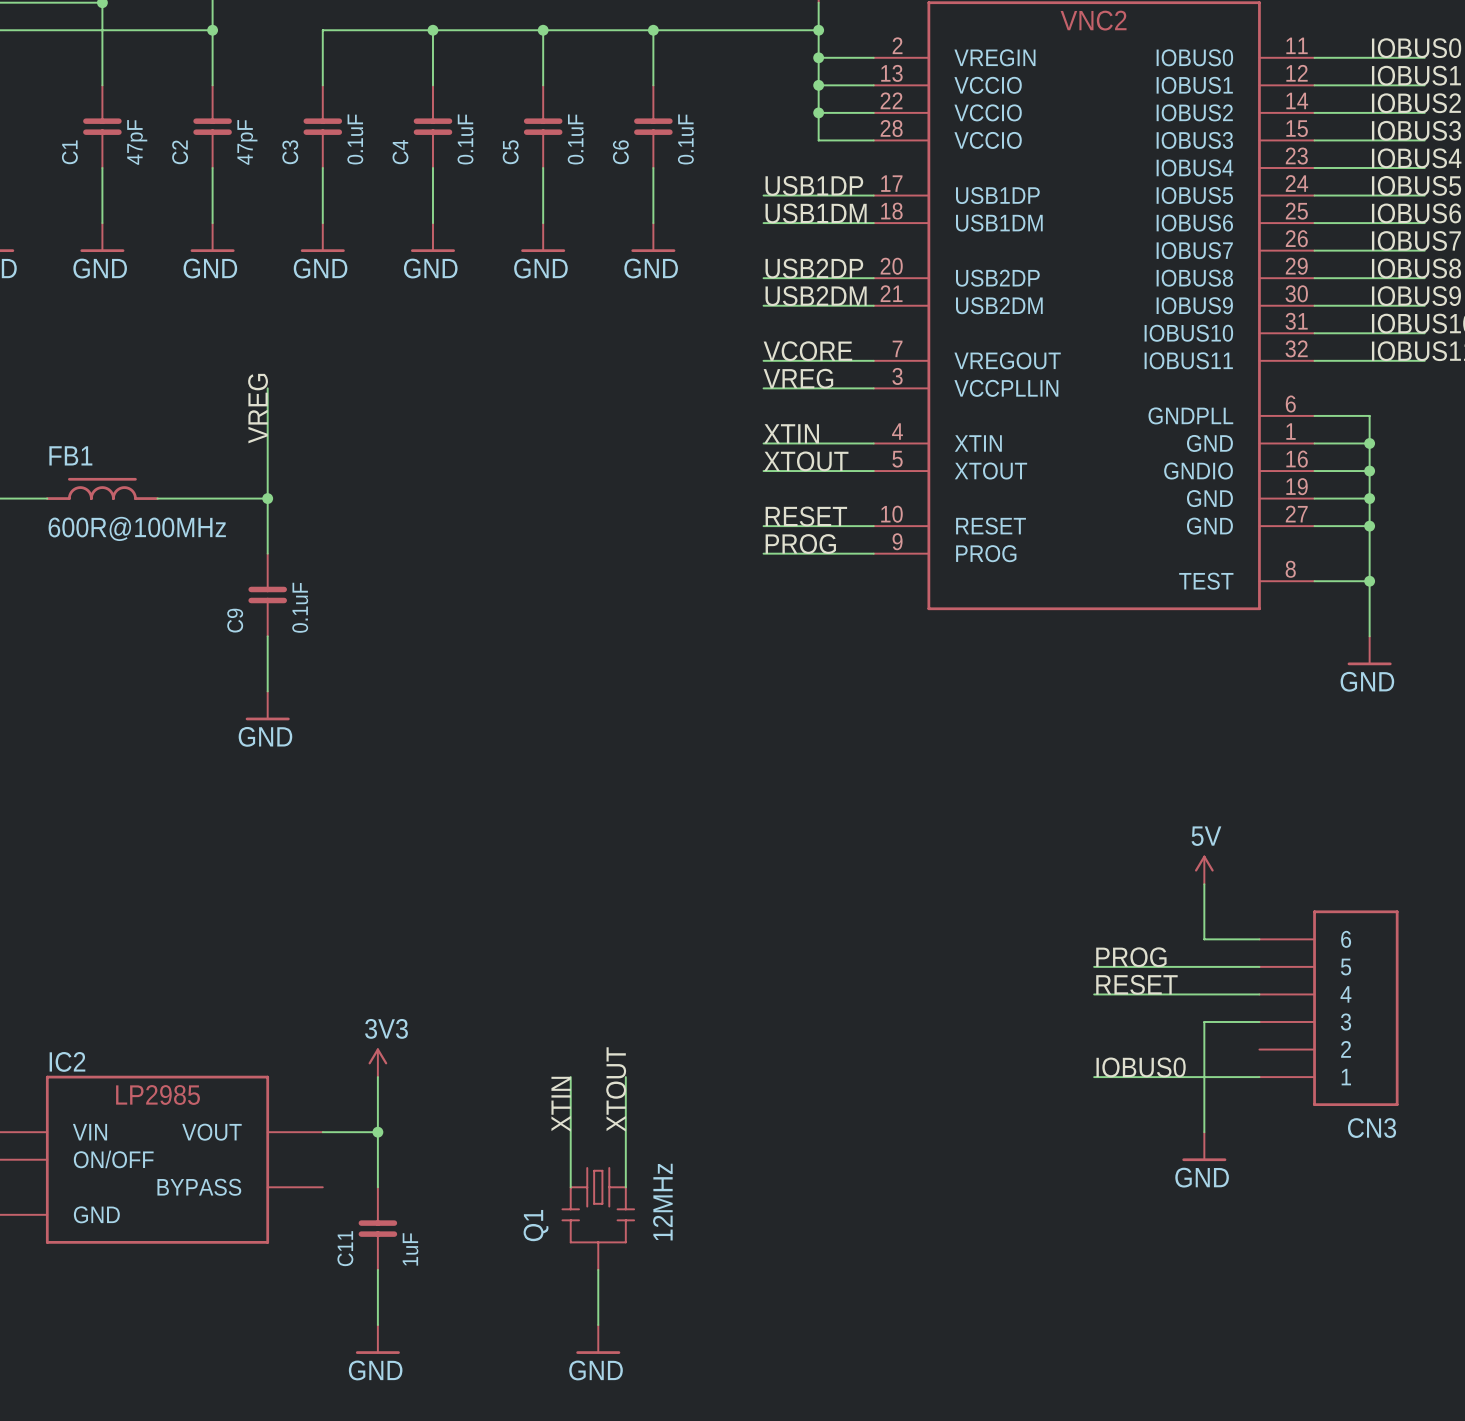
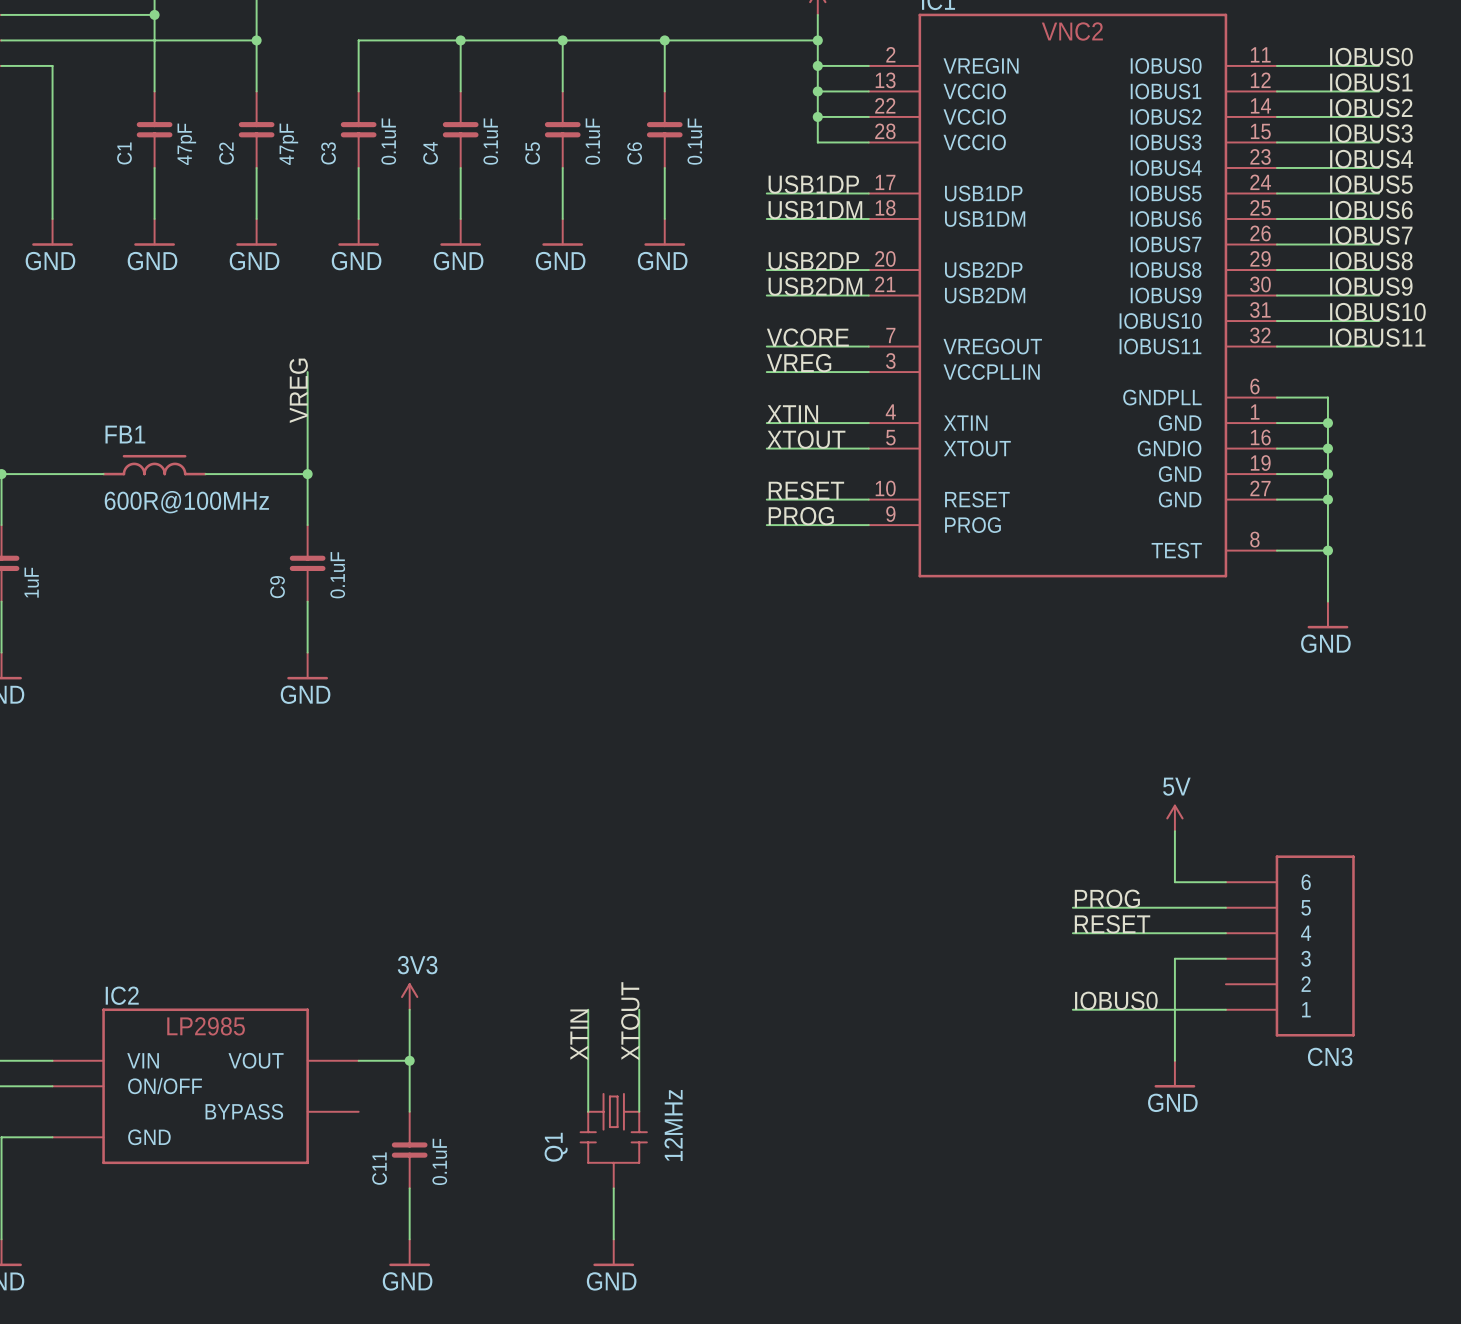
C11 value: 1uF (410, 1249) -> 0.1uF (439, 1161)

